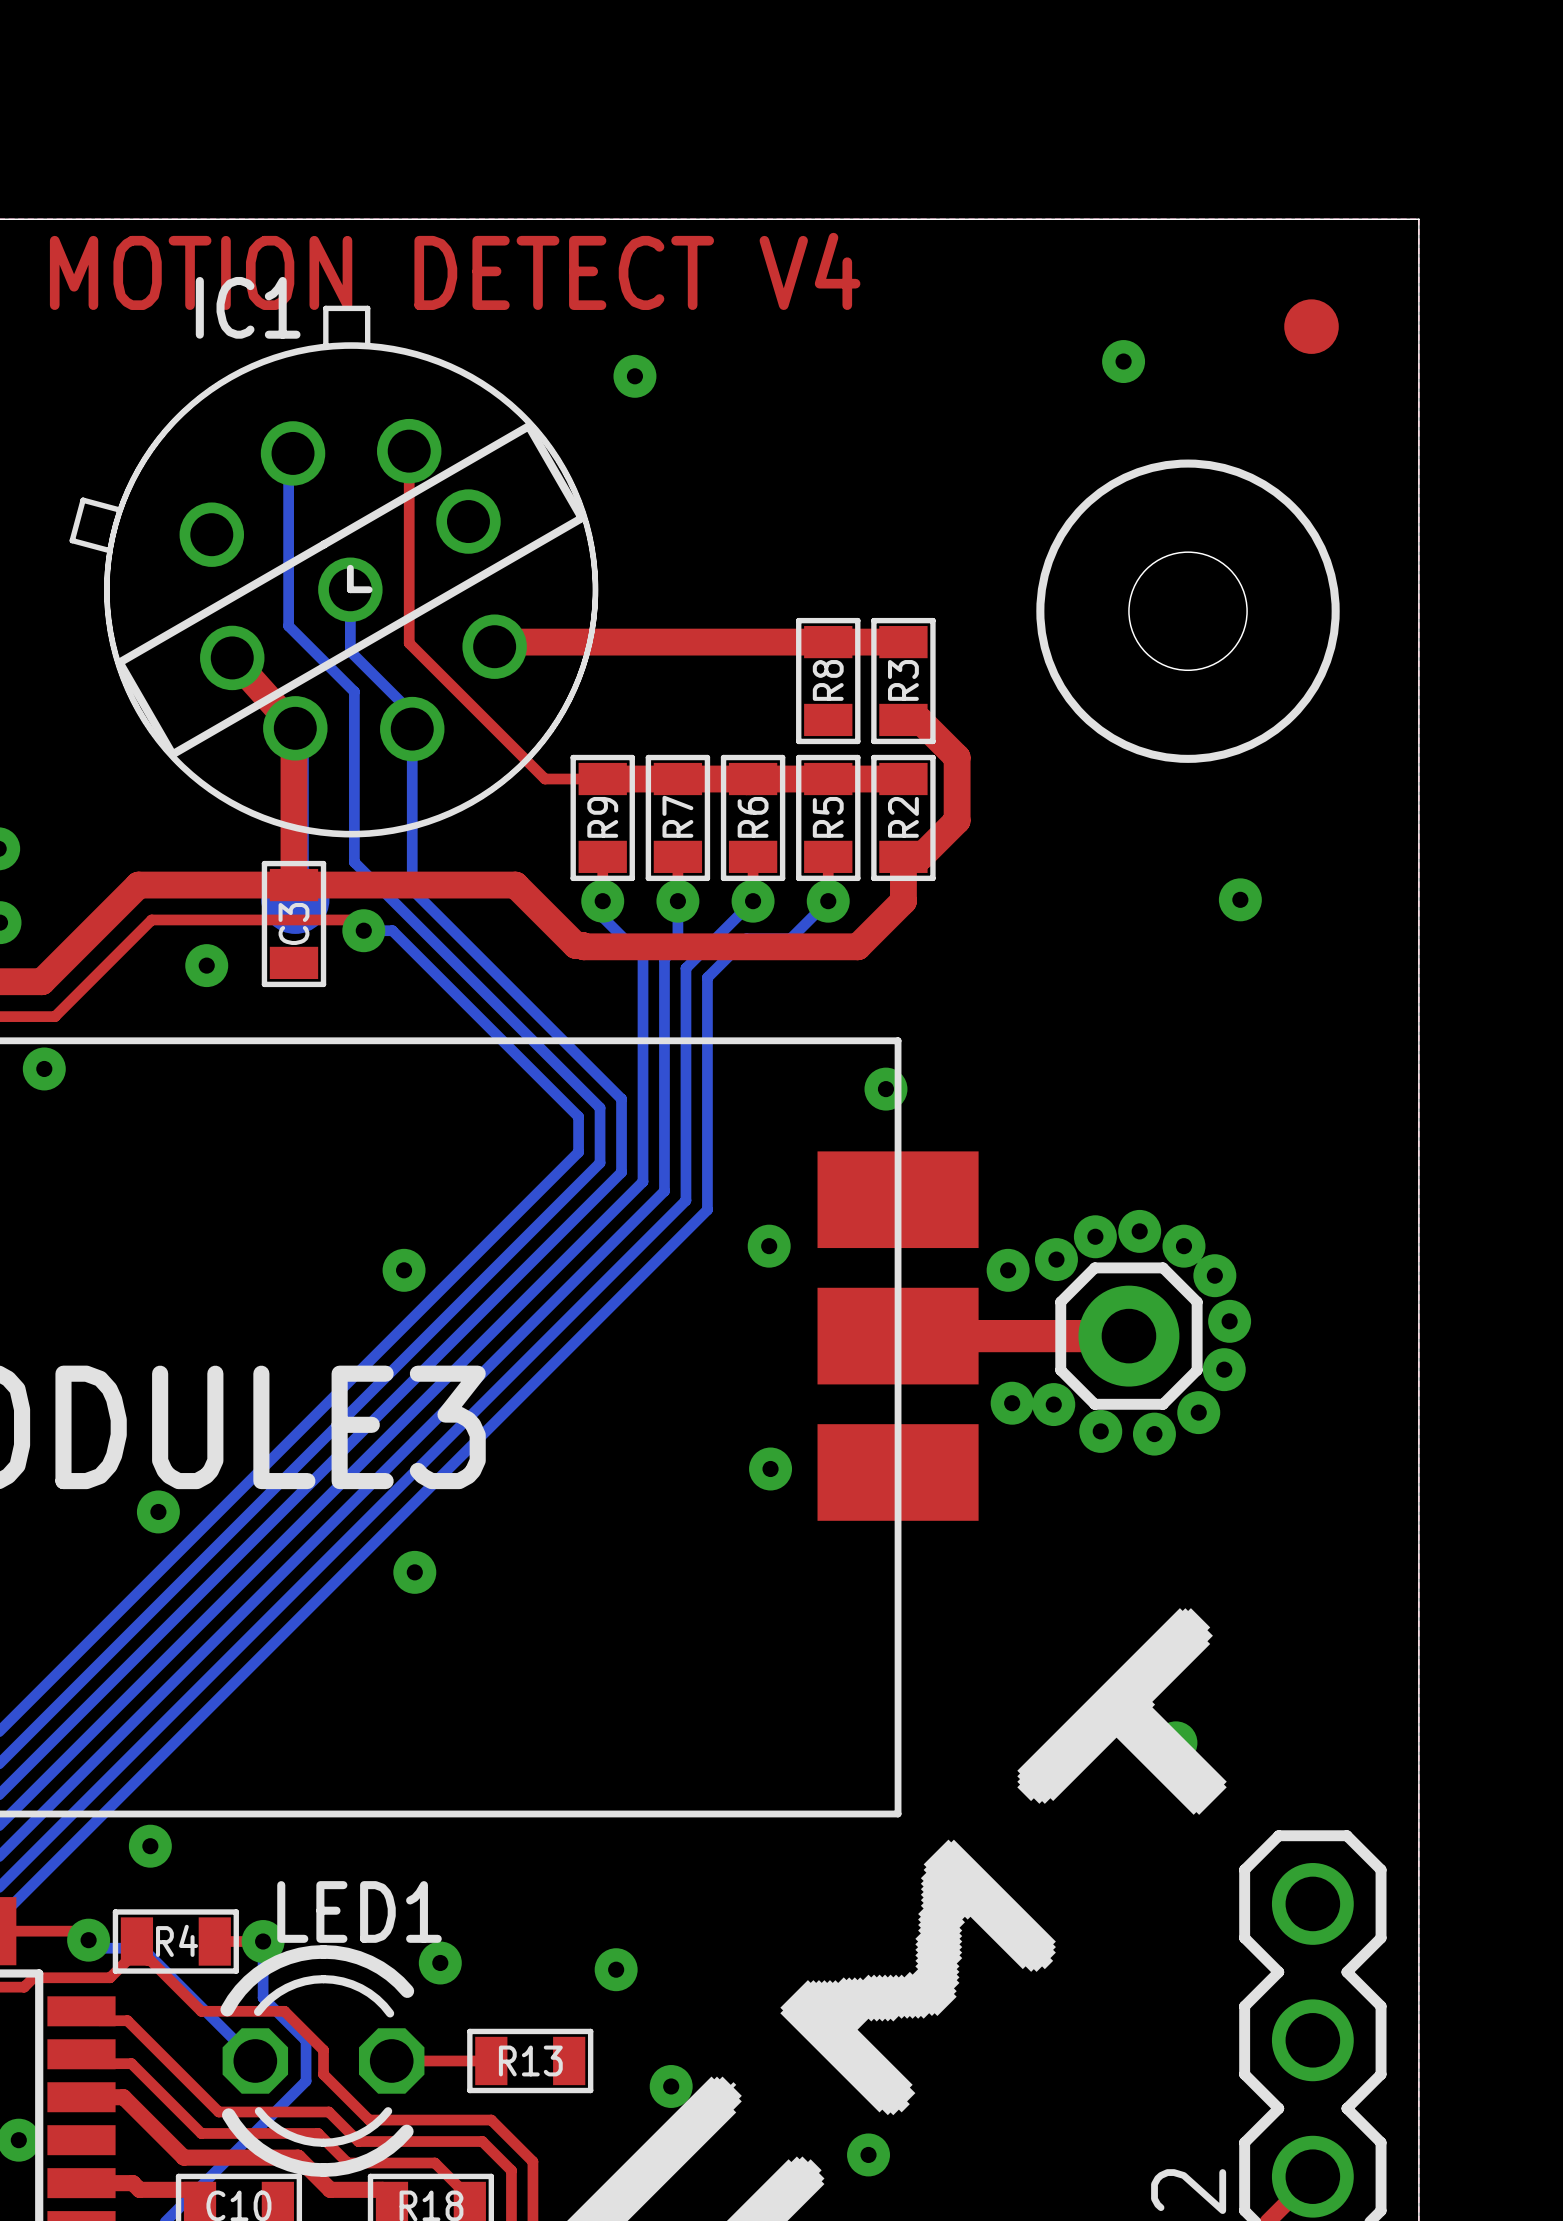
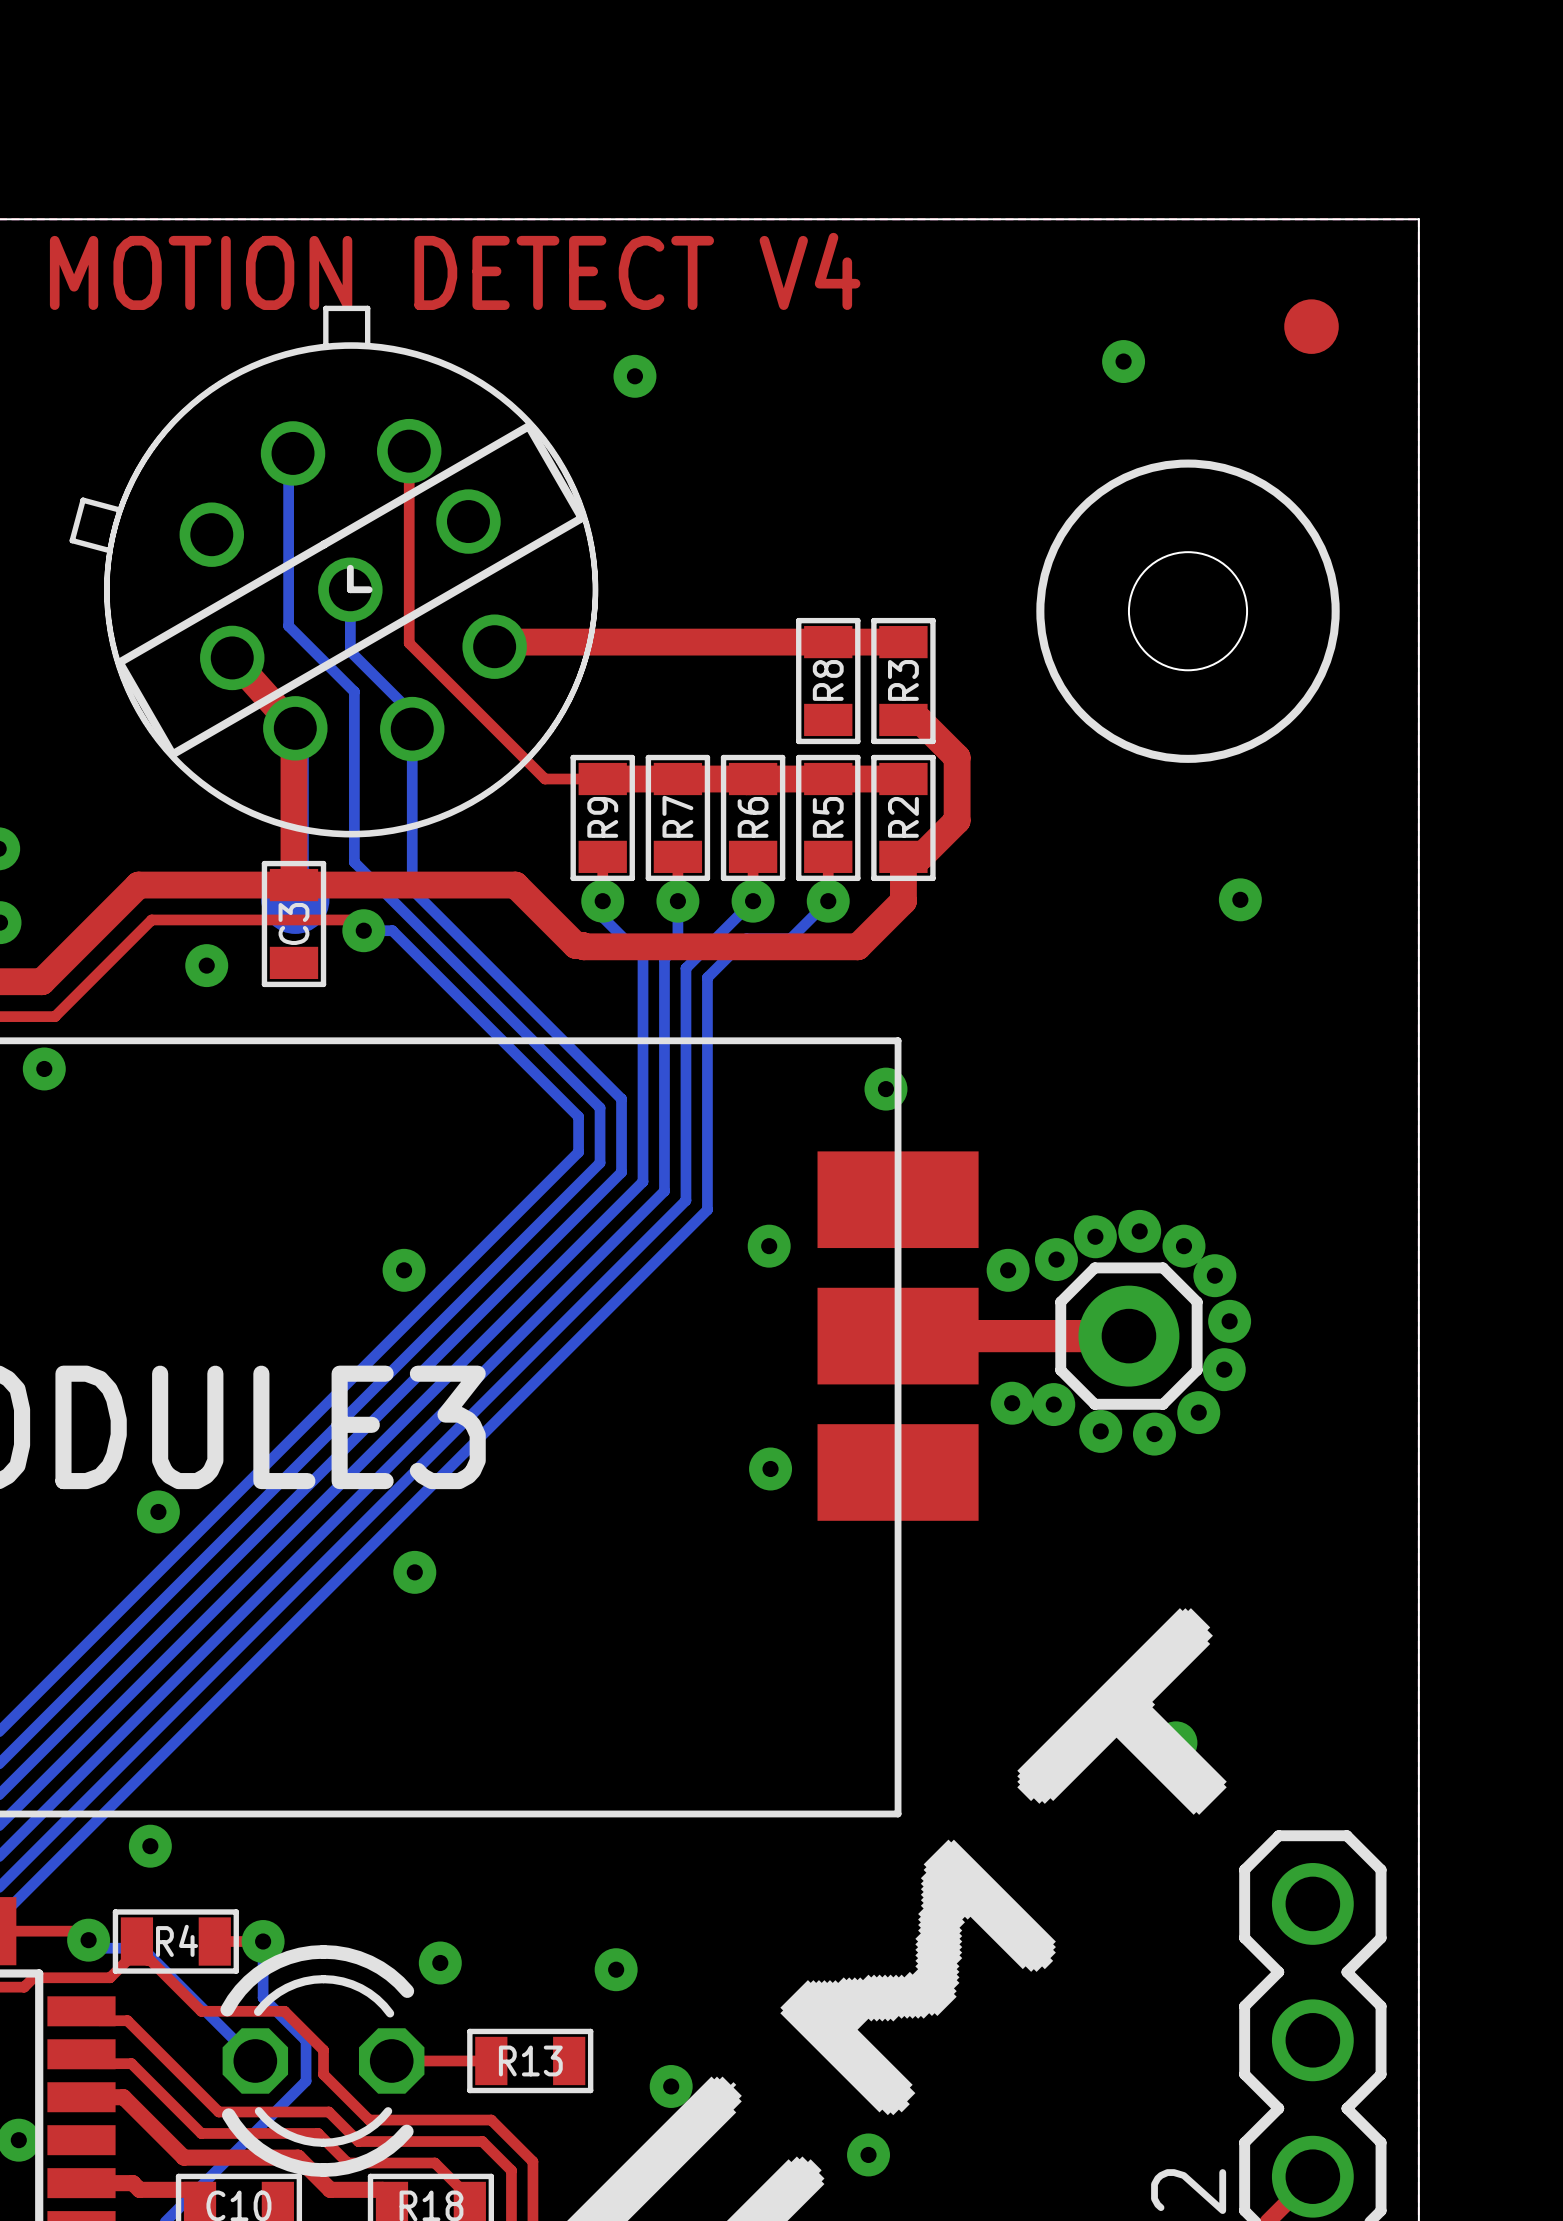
text: IC1 (248, 307) -> none
LED1 name: LED1 (359, 1911) -> none

